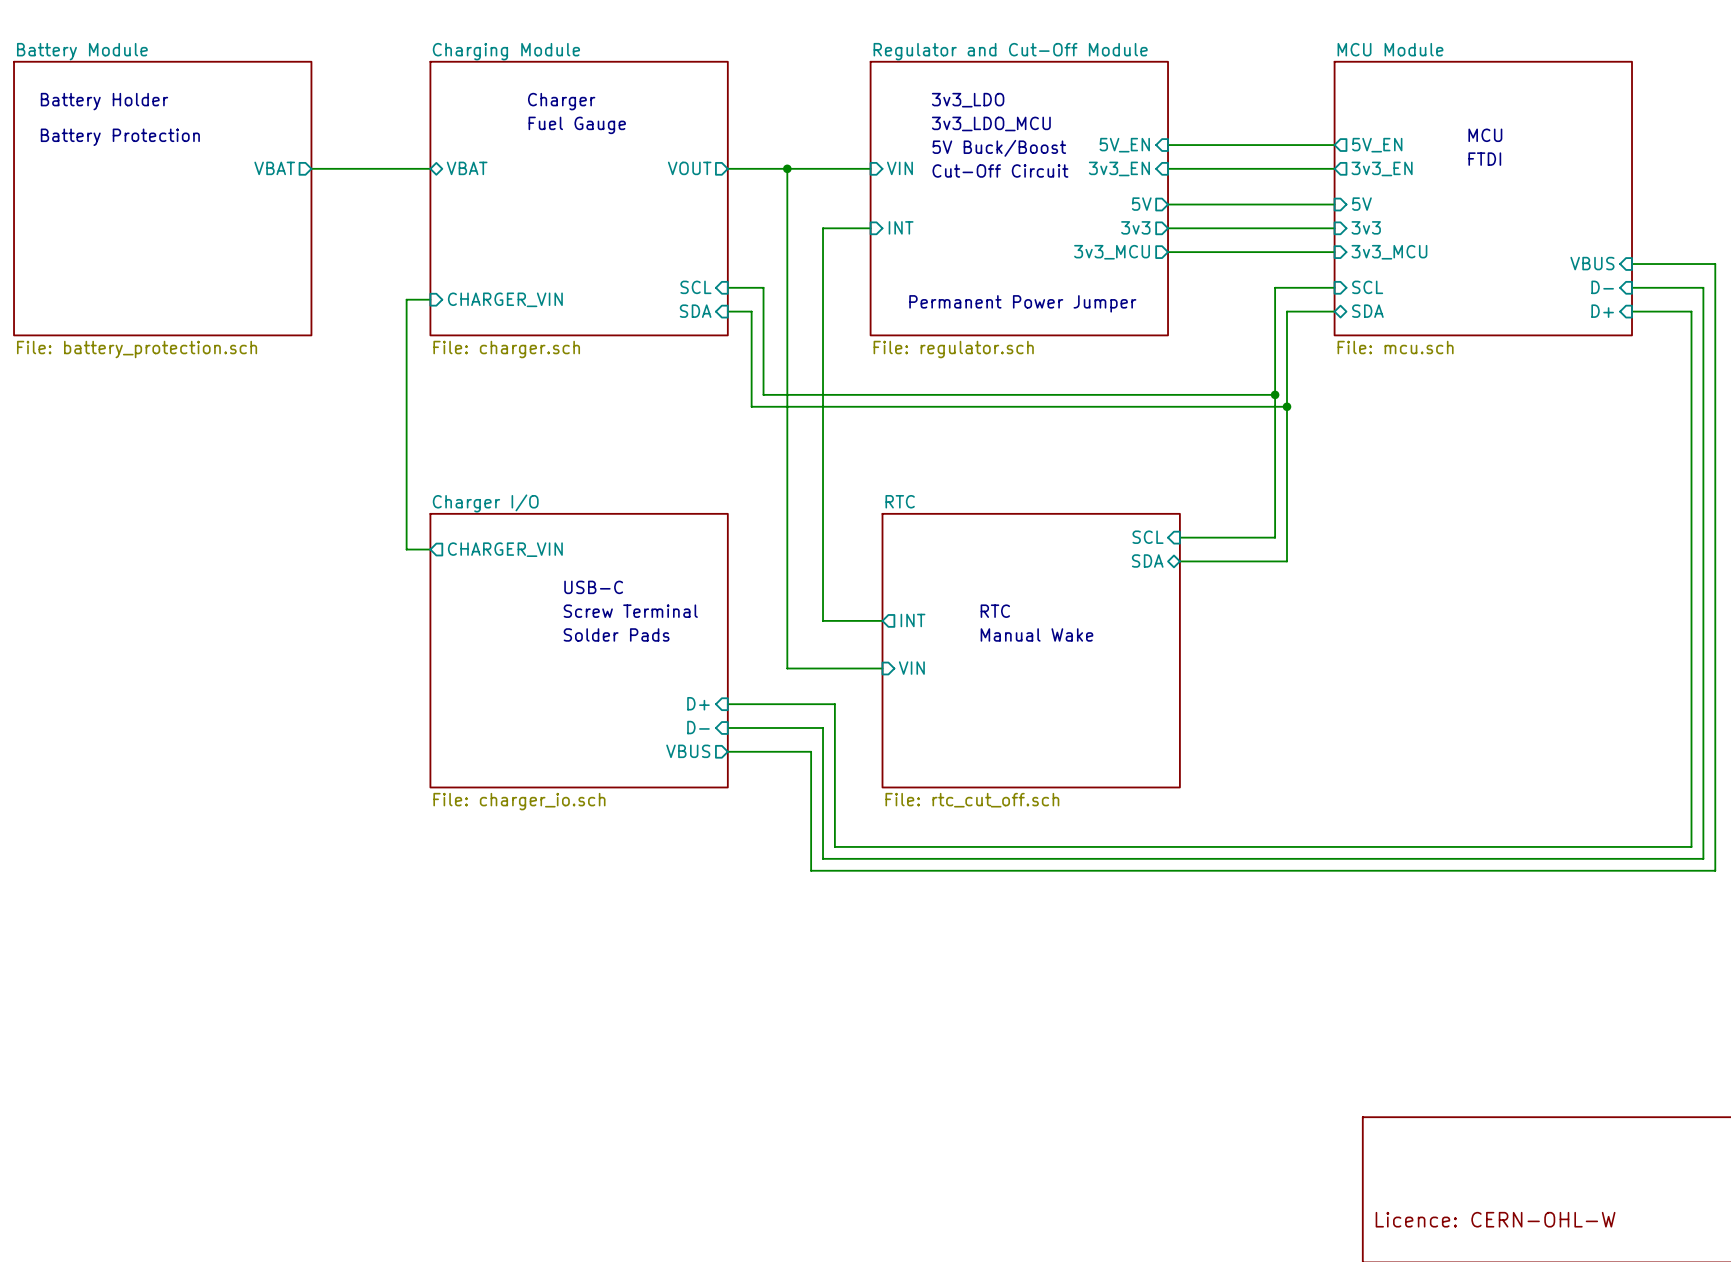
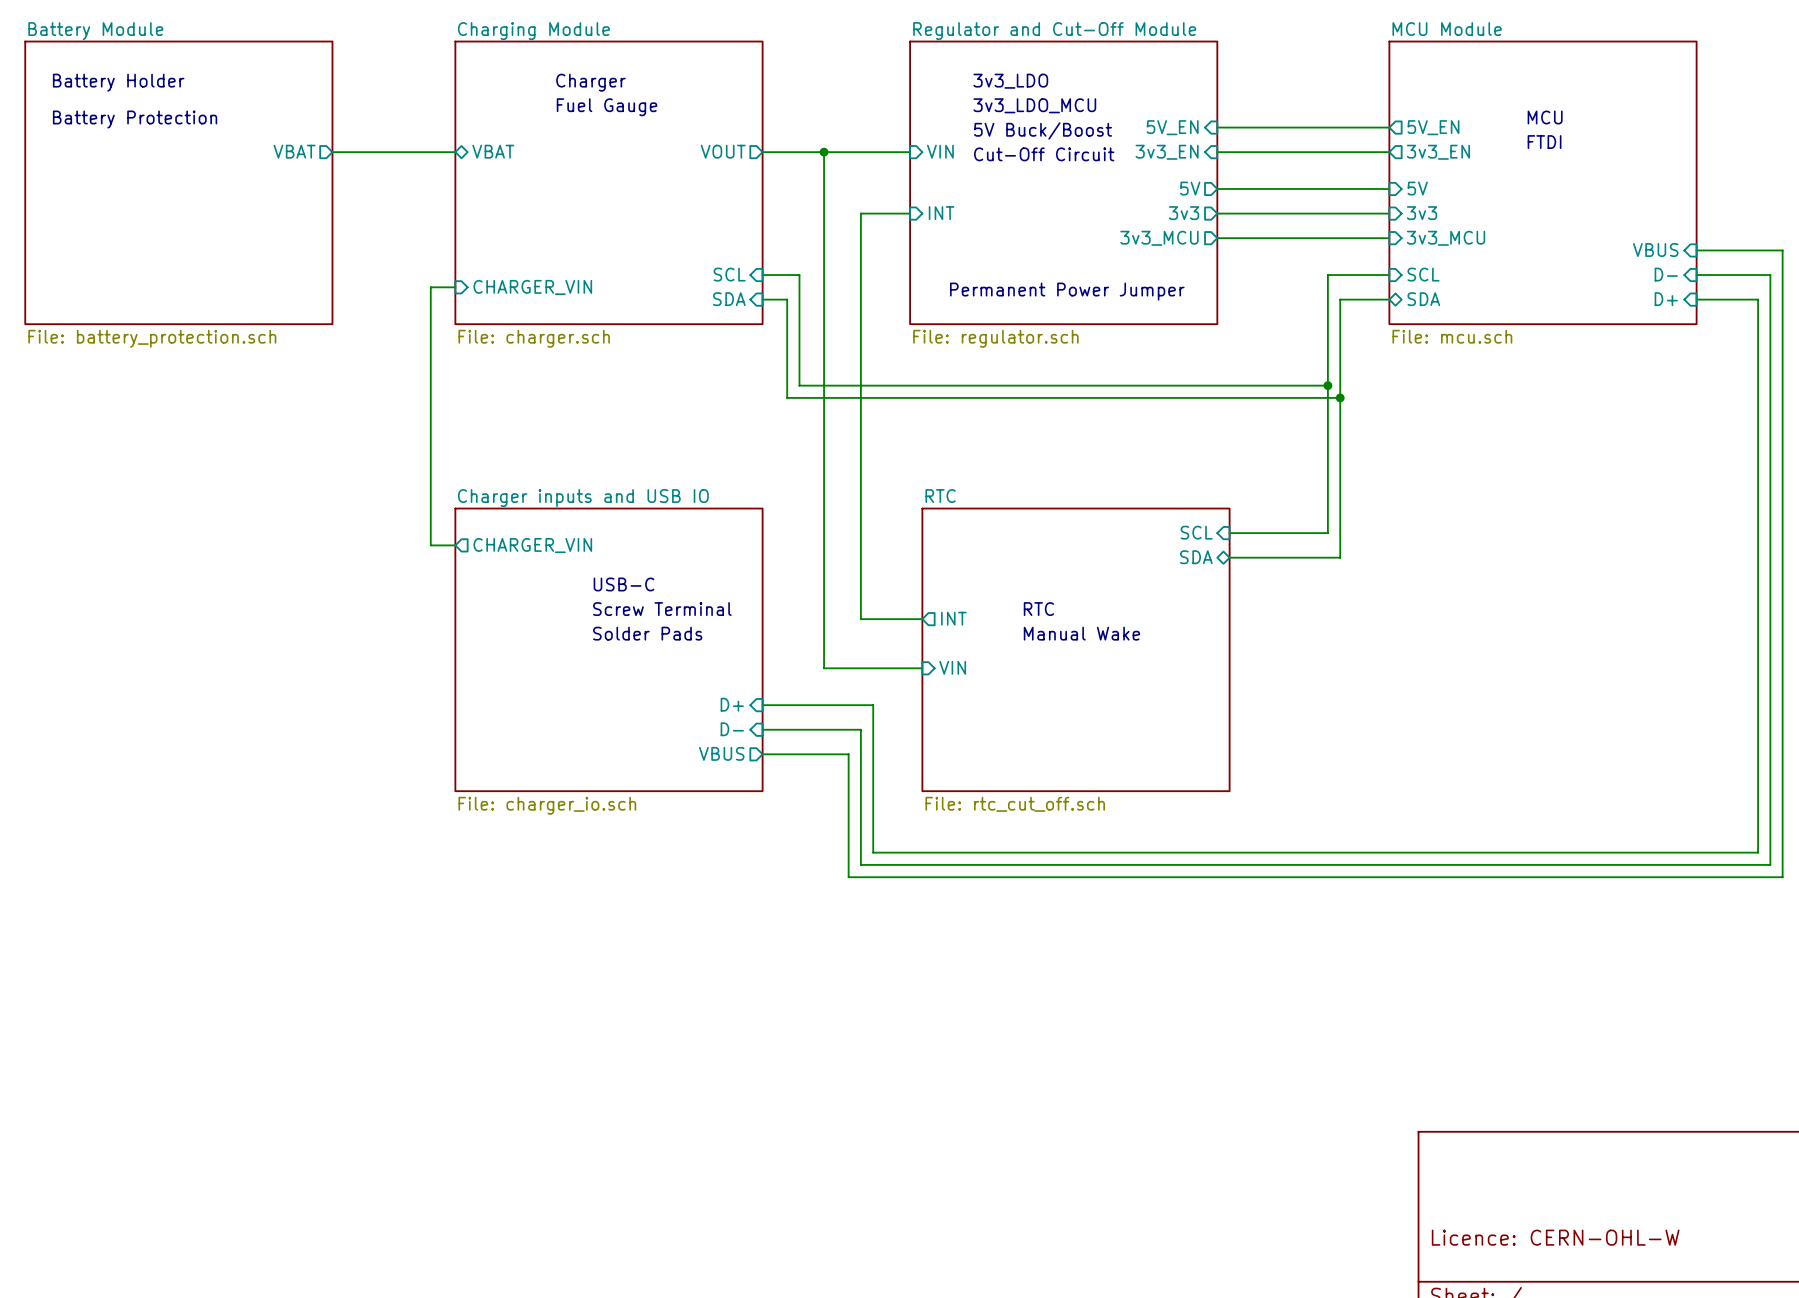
sheet Charger I/O name: Charger I/O (485, 503) -> Charger inputs and USB IO (583, 498)

